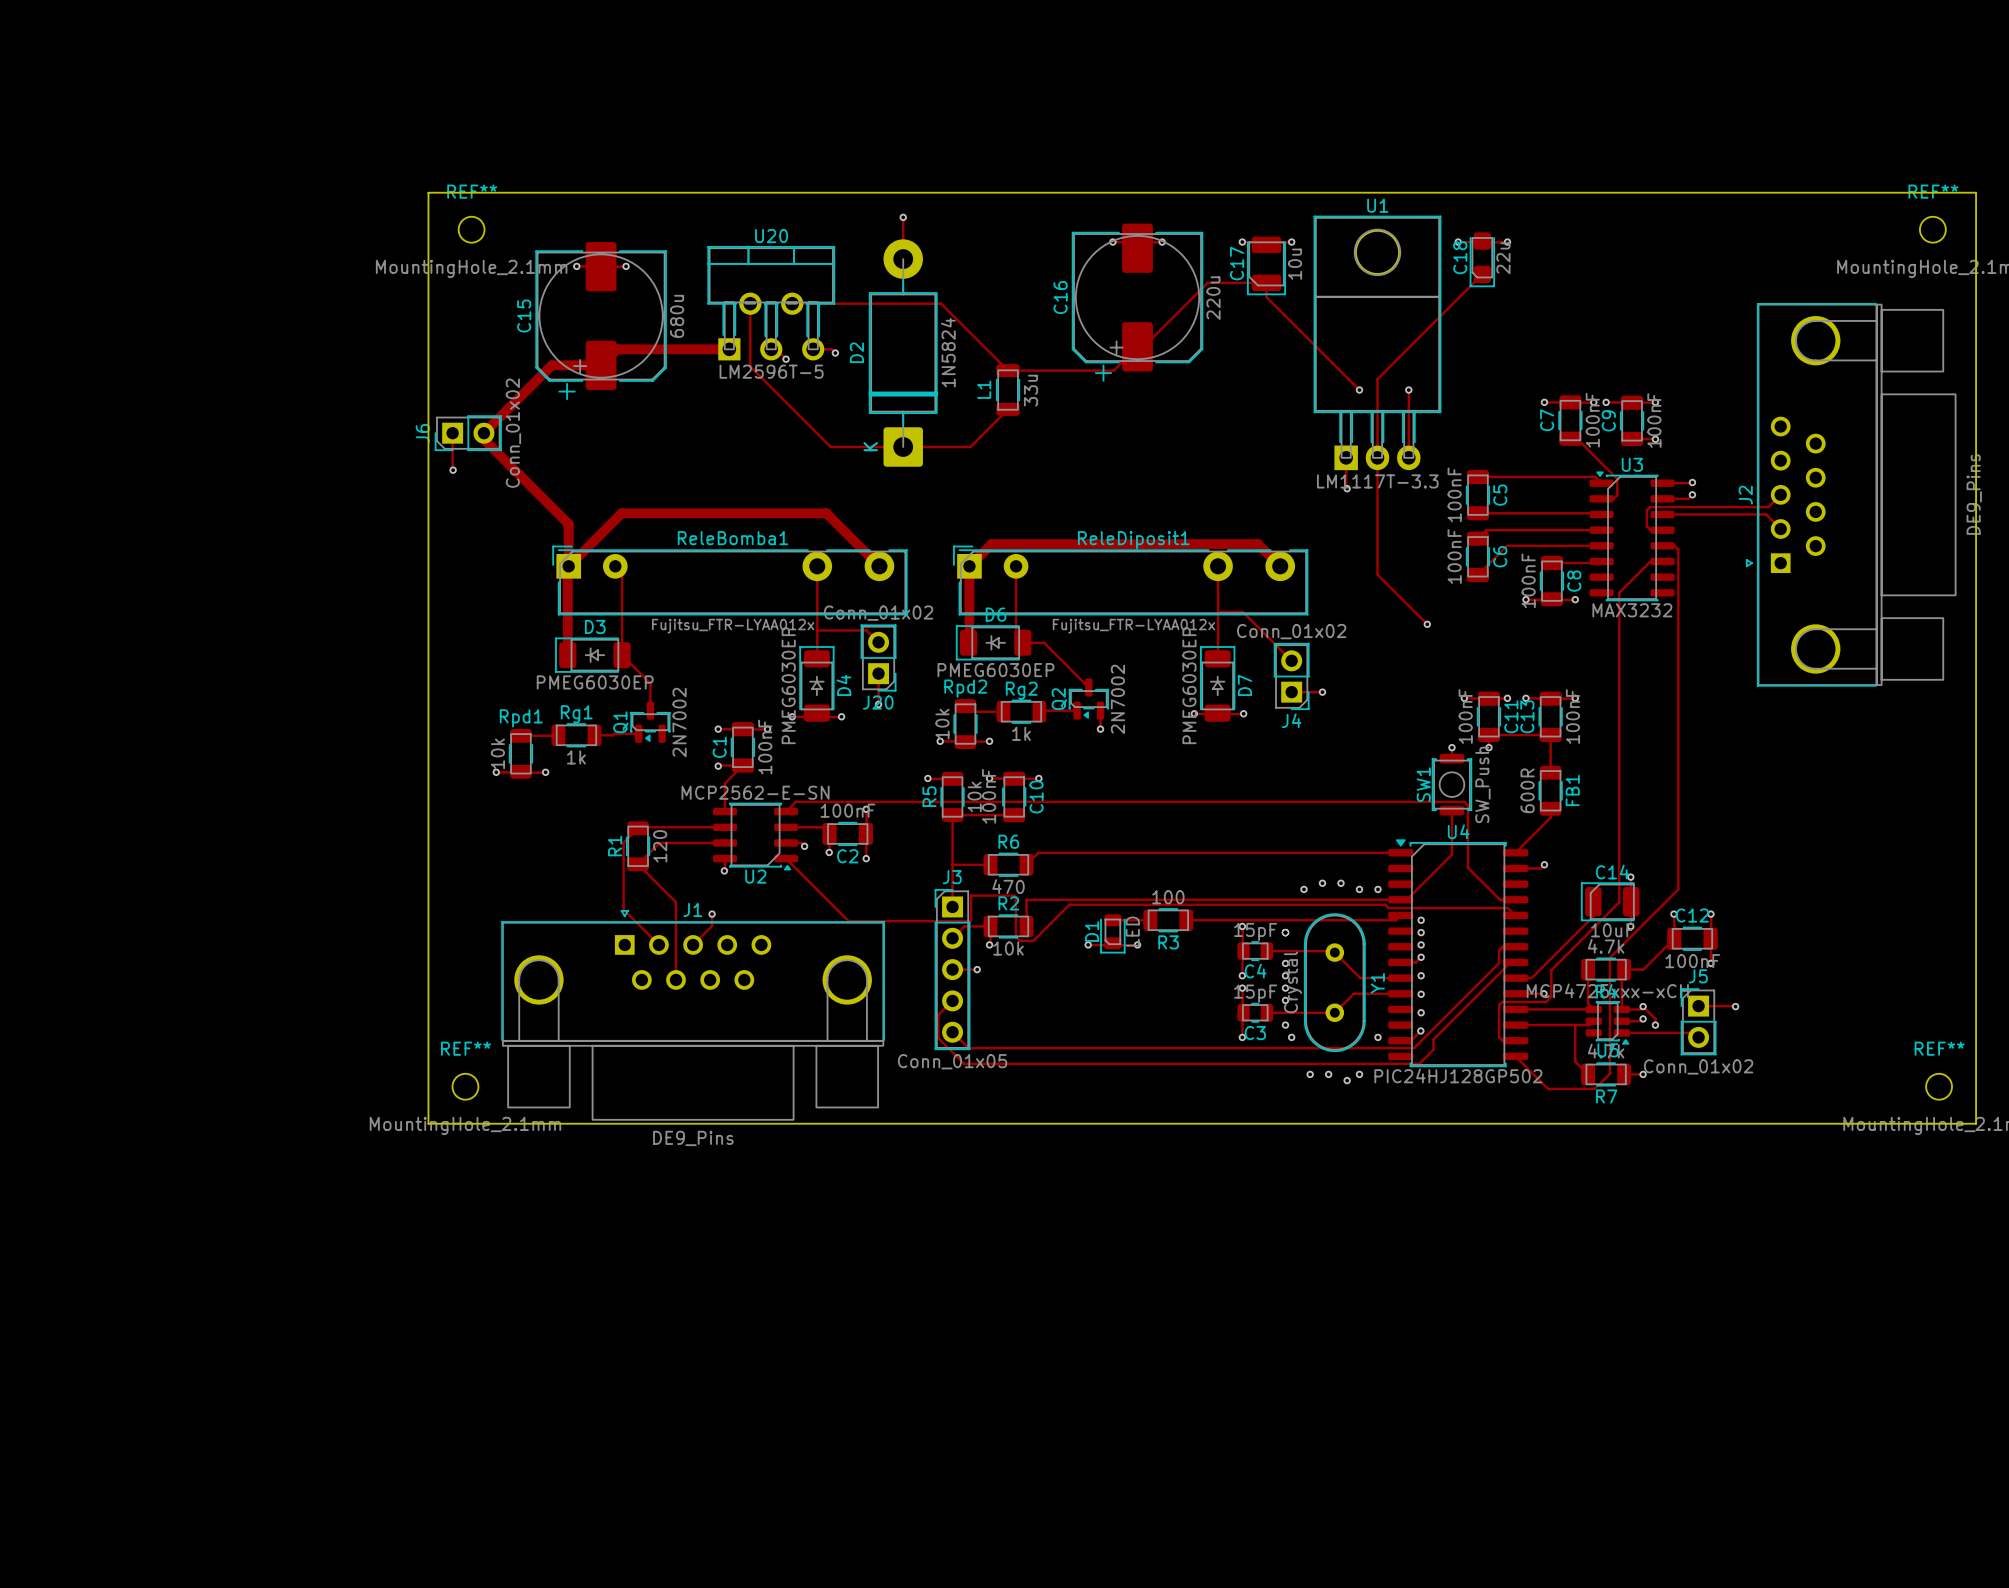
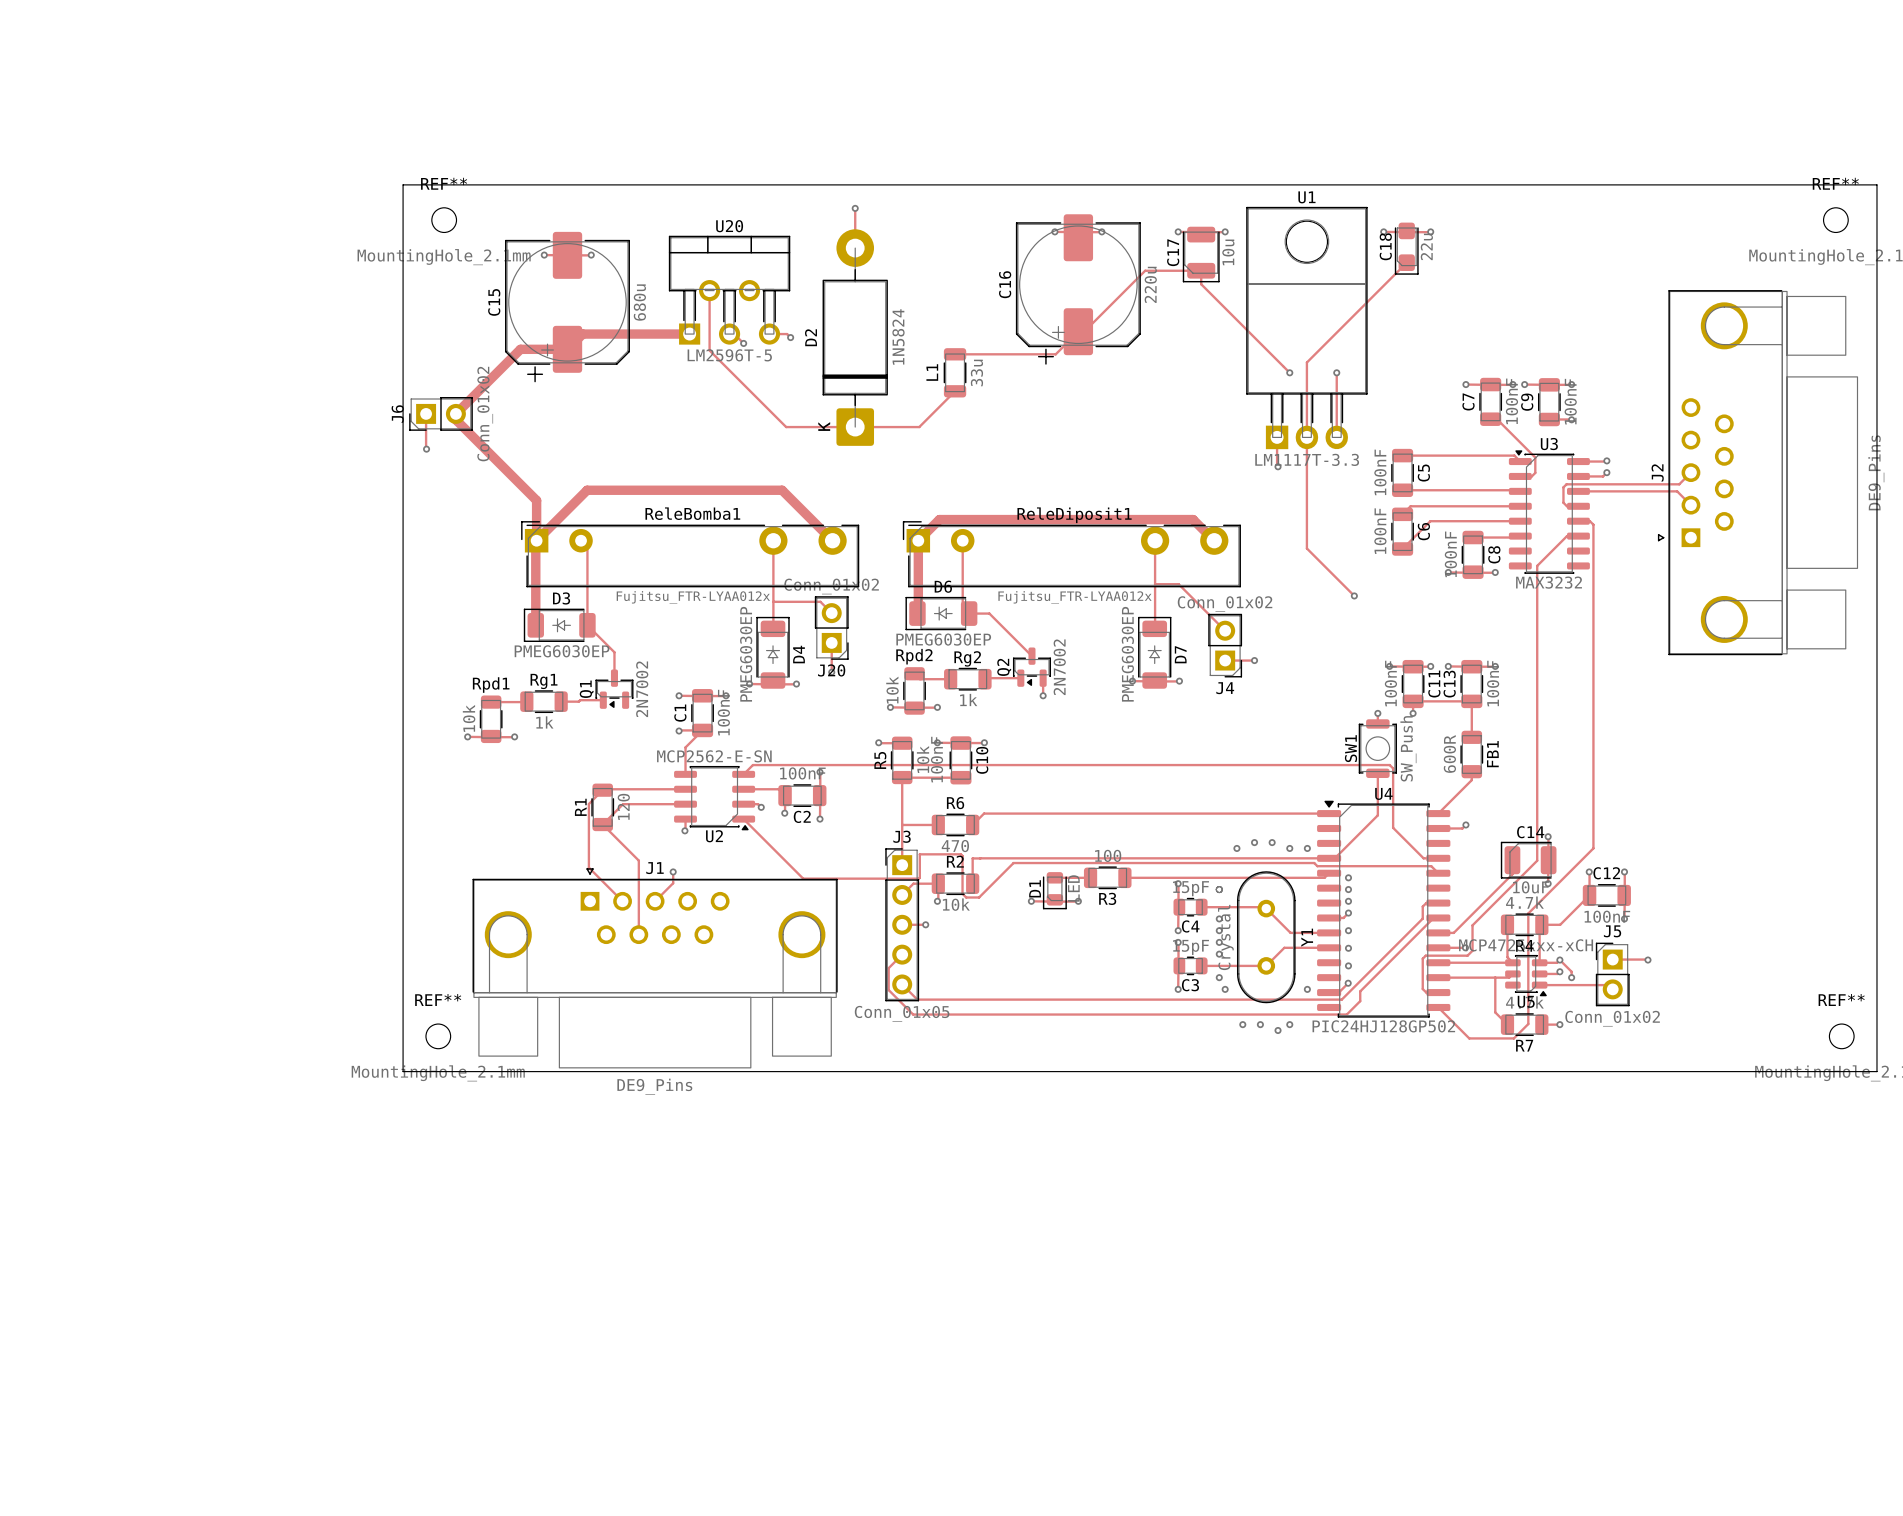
track: (792, 303) (941, 303) (1008, 370) -> none

